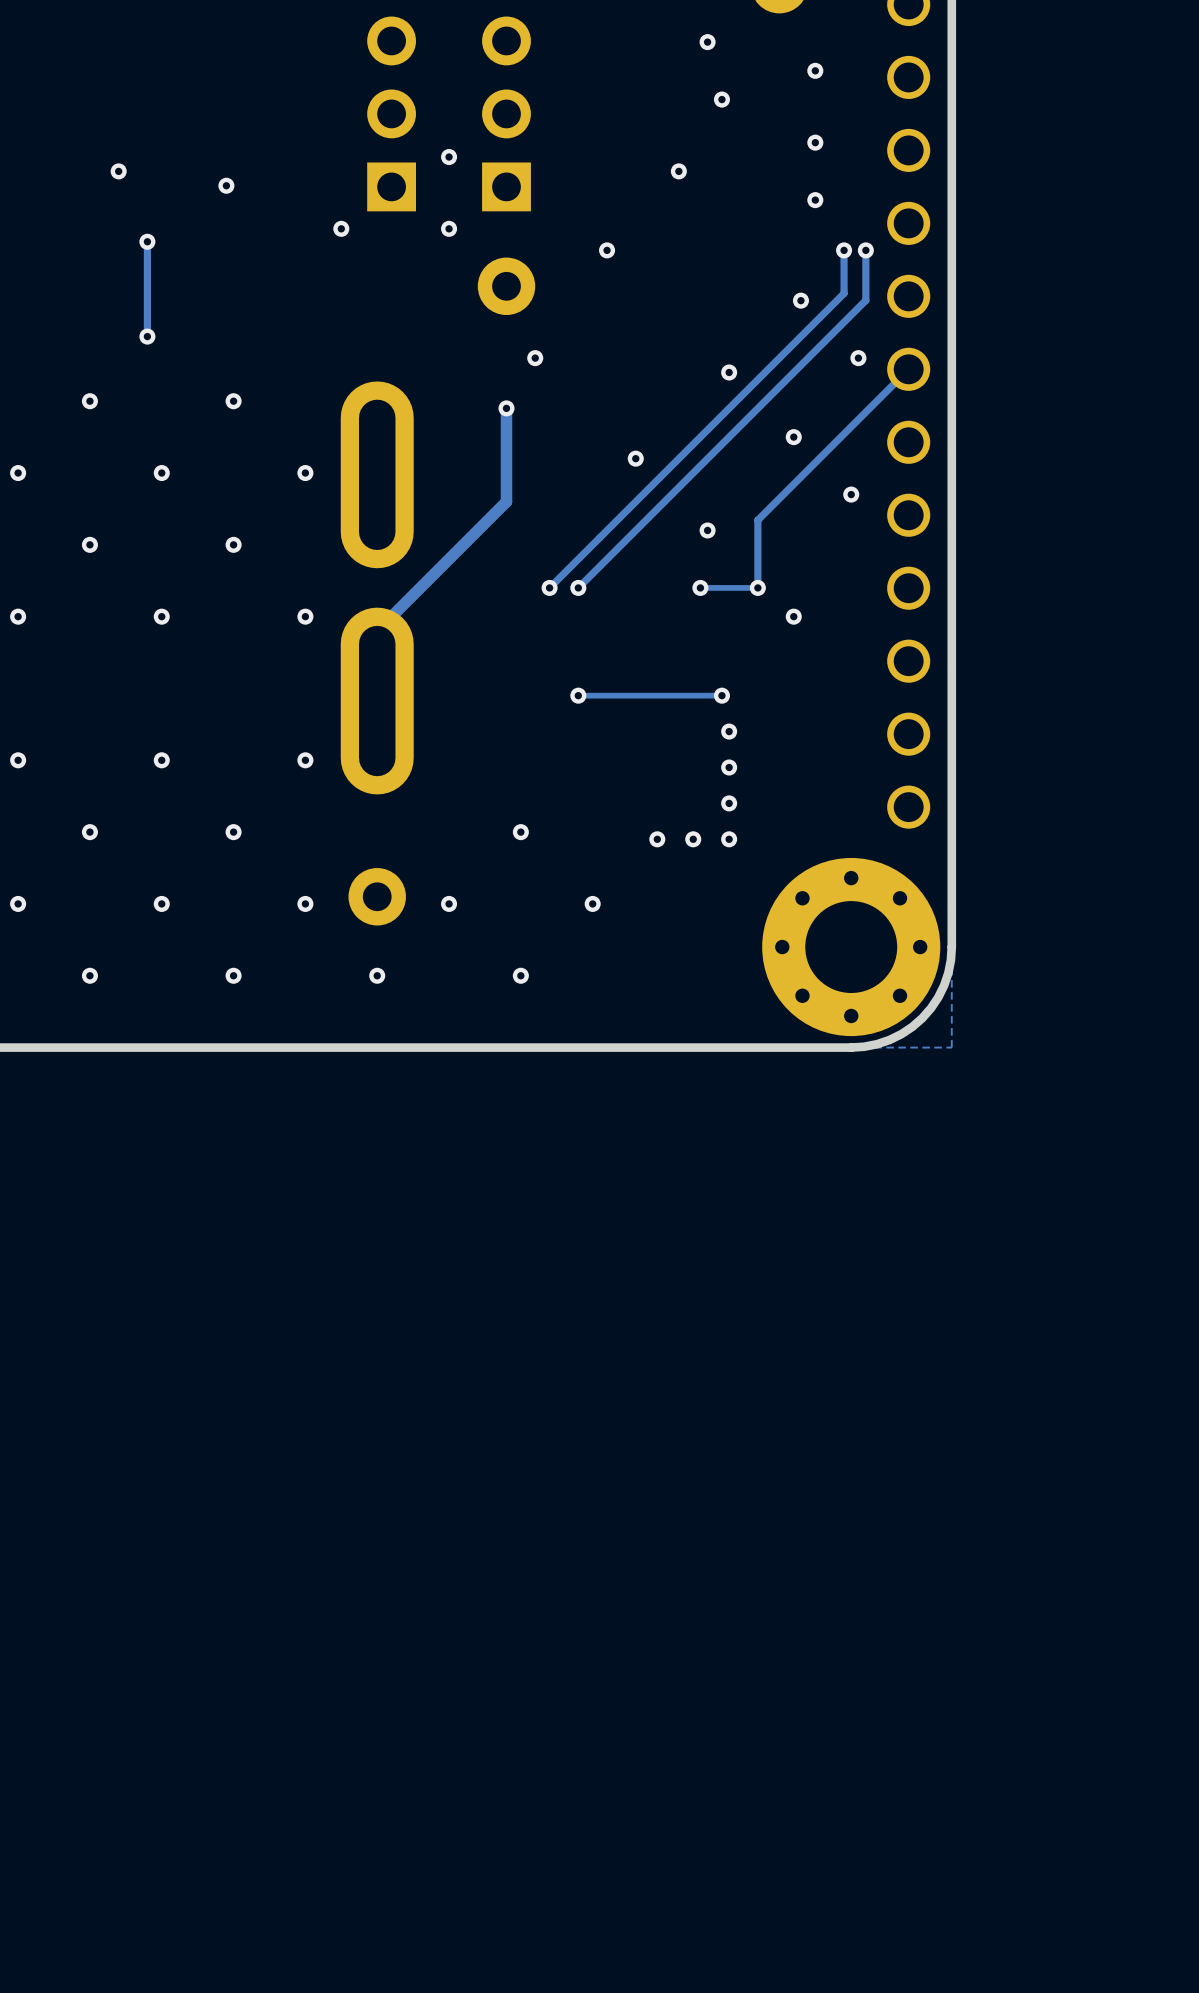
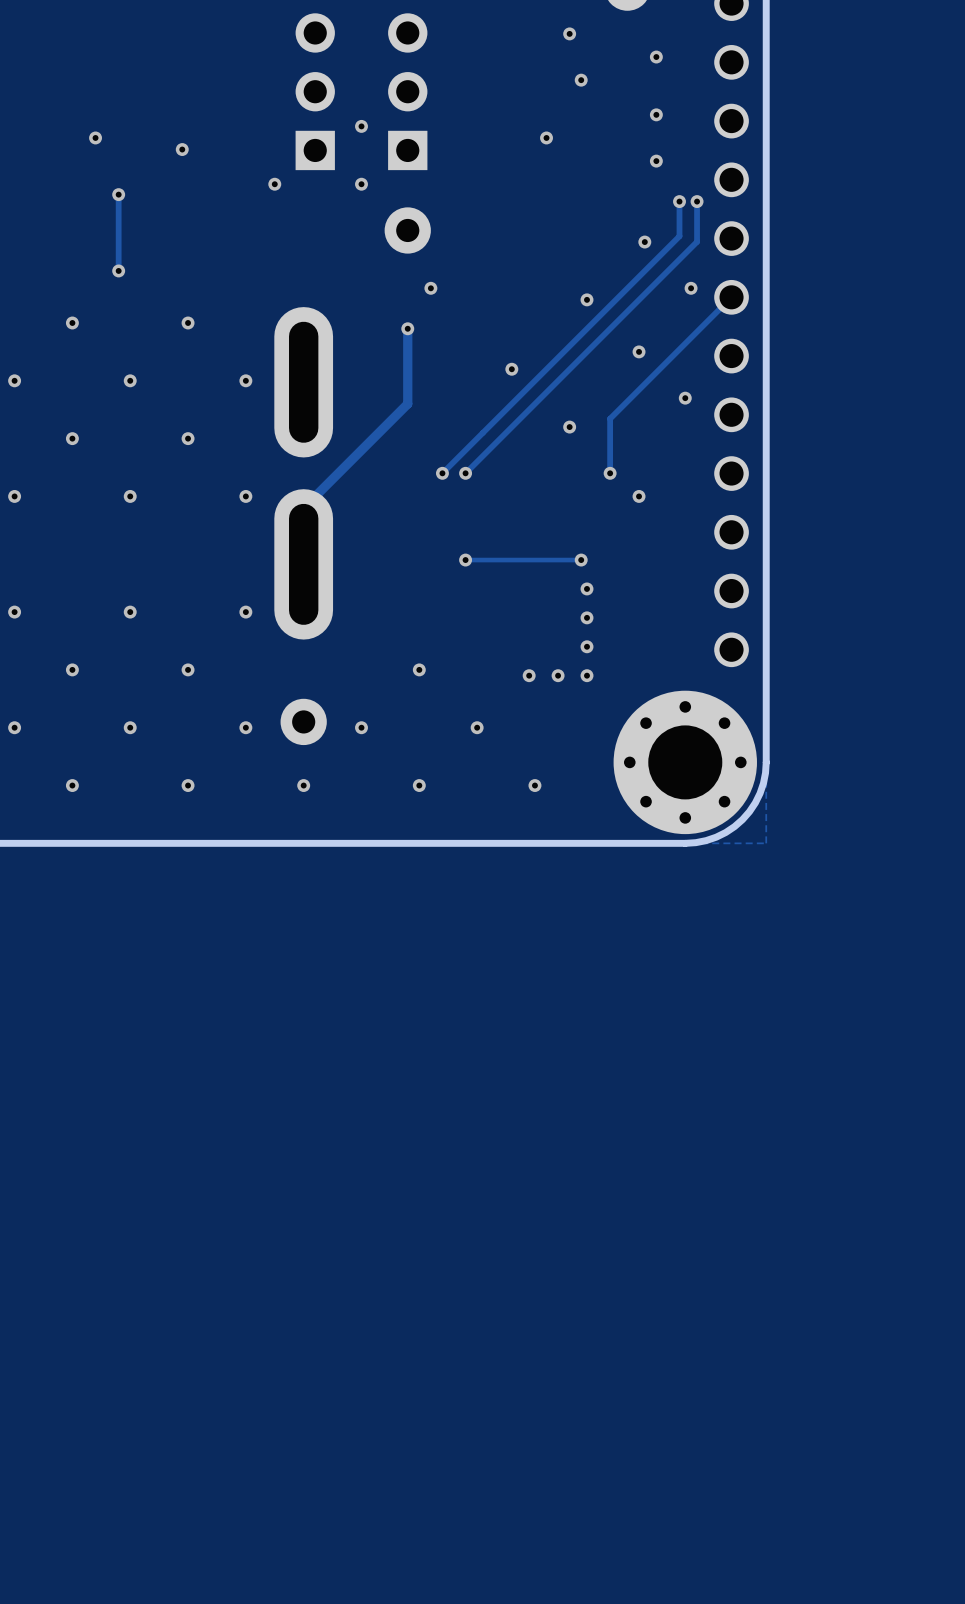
via: (607, 250) -> none
via: (700, 587) -> none
track: (757, 587) (700, 587) -> none
via: none -> (534, 785)

